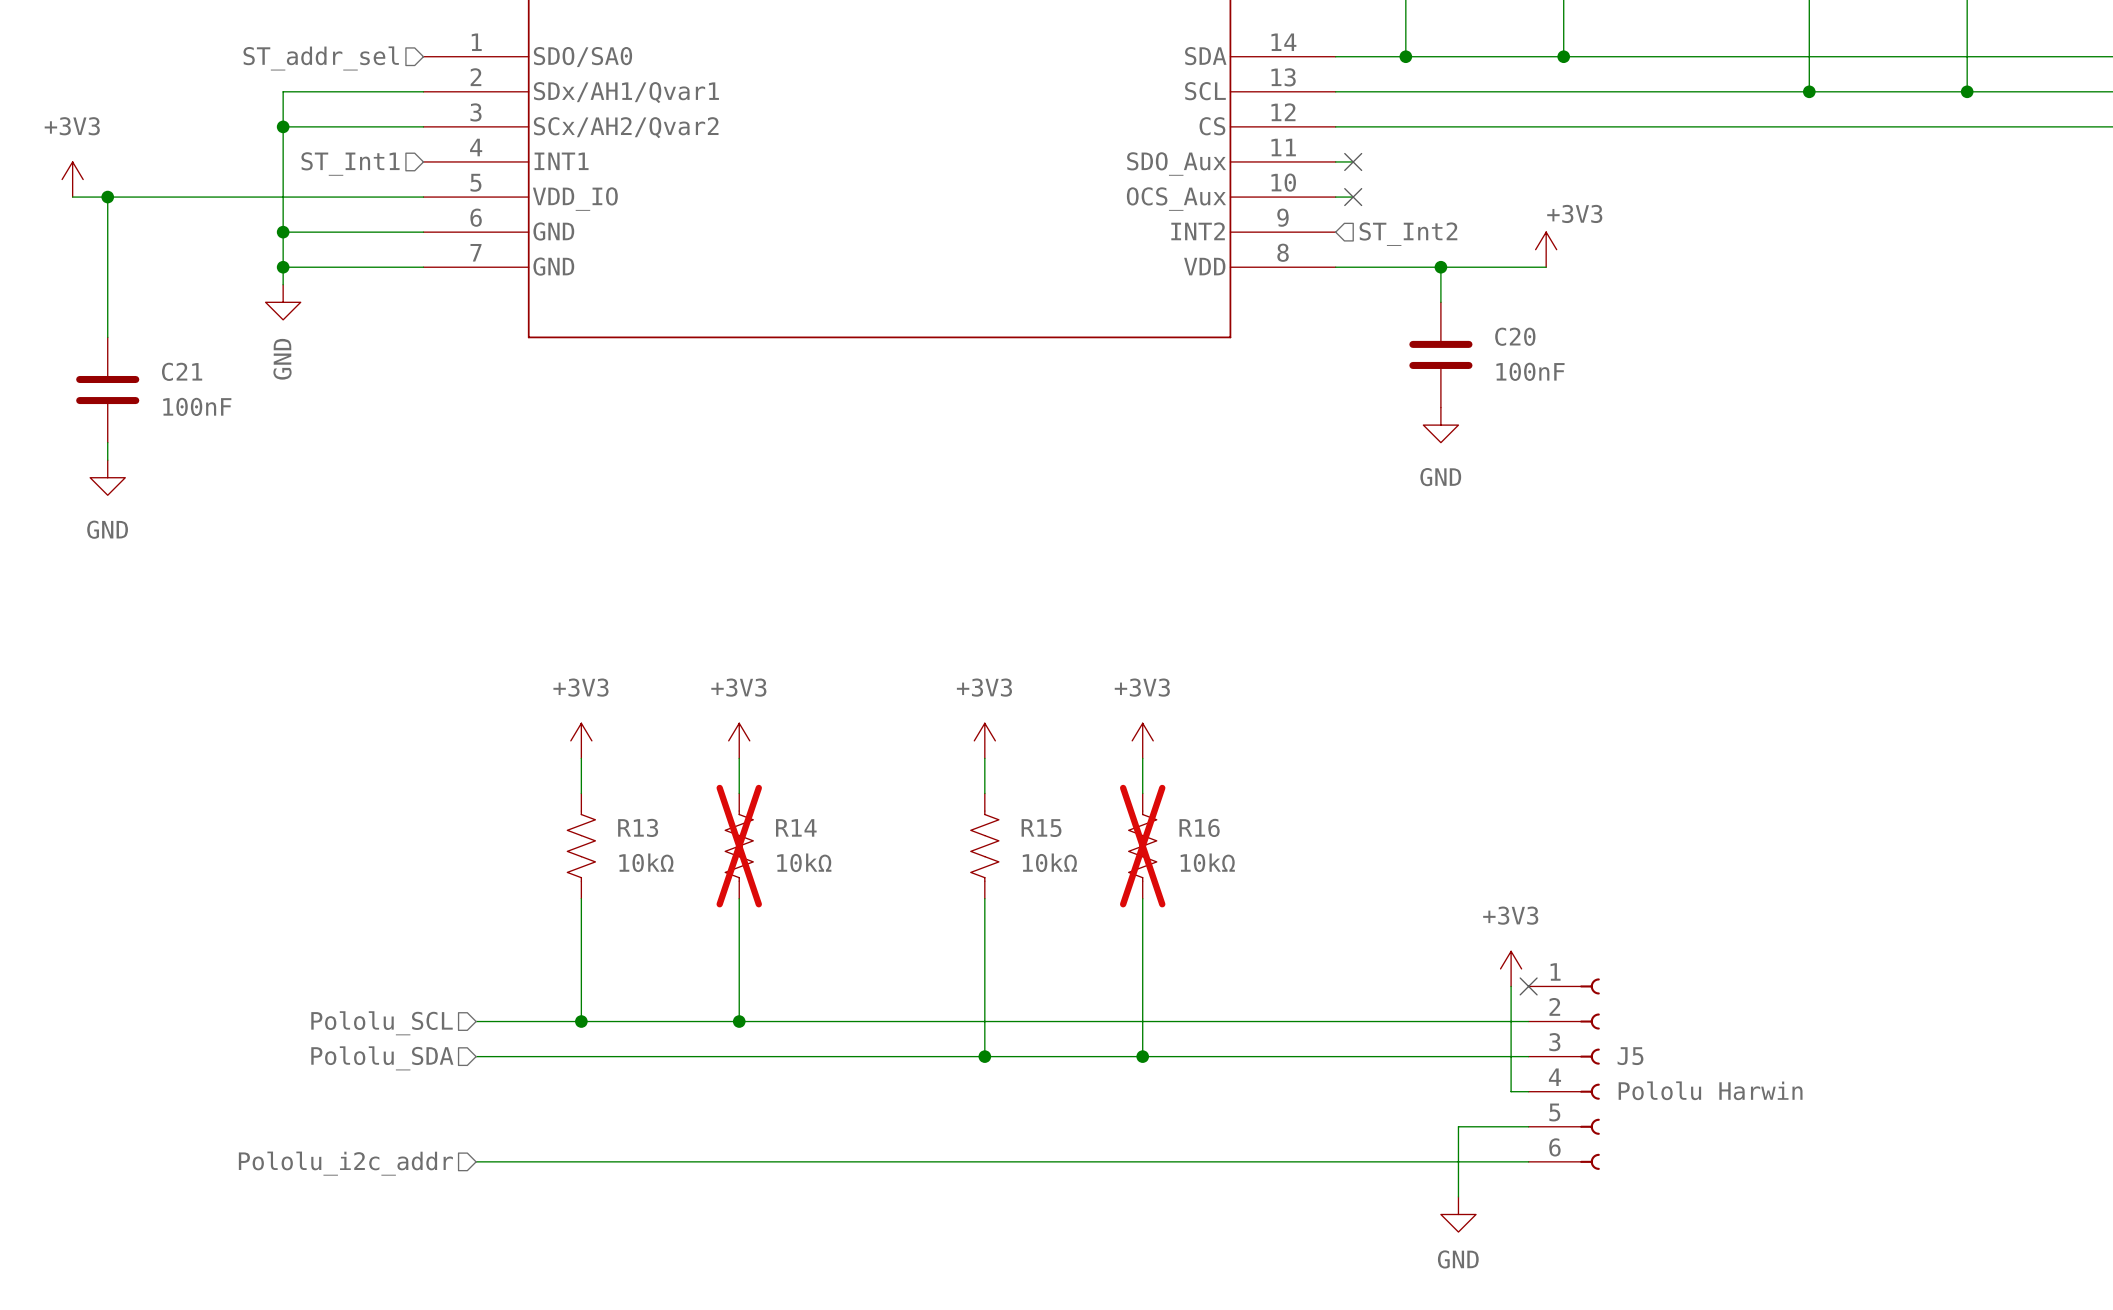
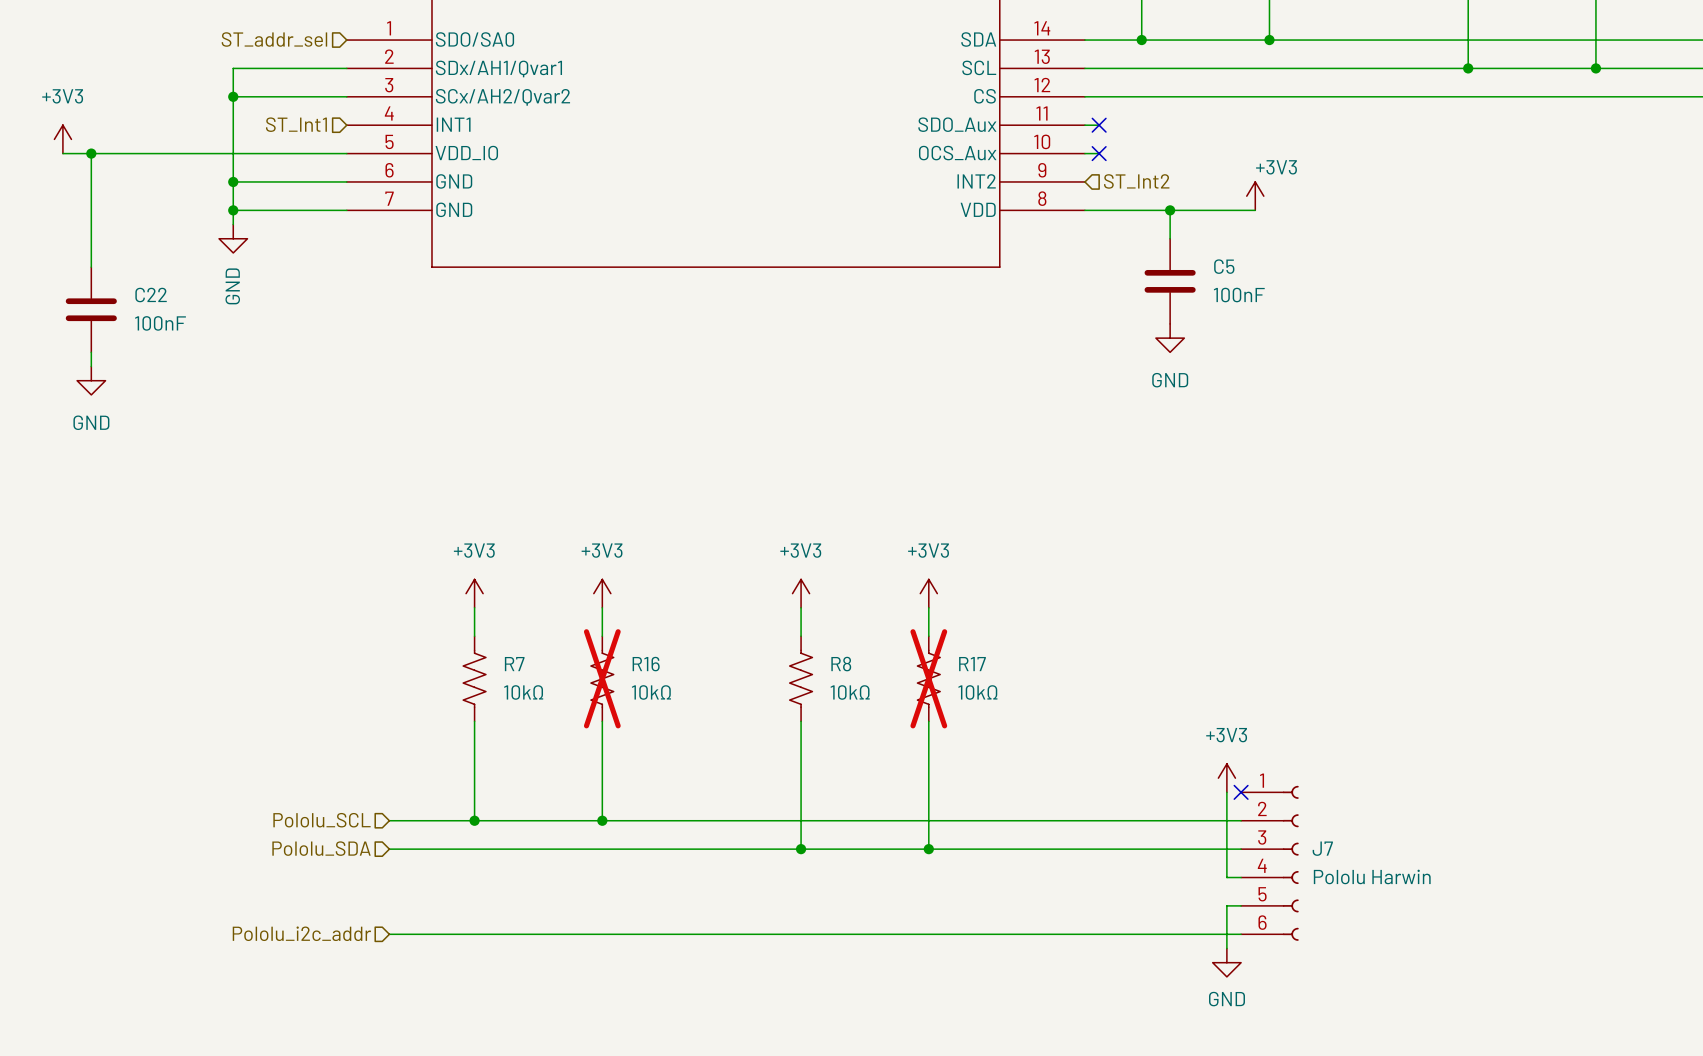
C20 name: C20 (1515, 336) -> C5 (1224, 266)
C21 name: C21 (182, 371) -> C22 (151, 295)
R13 name: R13 (638, 827) -> R7 (514, 664)
R14 name: R14 (796, 827) -> R16 (646, 664)
R16 name: R16 (1199, 827) -> R17 (972, 664)
R15 name: R15 (1041, 828) -> R8 (841, 664)
J5 name: J5 (1630, 1056) -> J7 (1322, 848)
wire: (1511, 1126) (1458, 1126) (1458, 1196) -> (1226, 905) (1226, 948)
power symbol position: GND (1458, 1214) -> GND (1226, 962)

